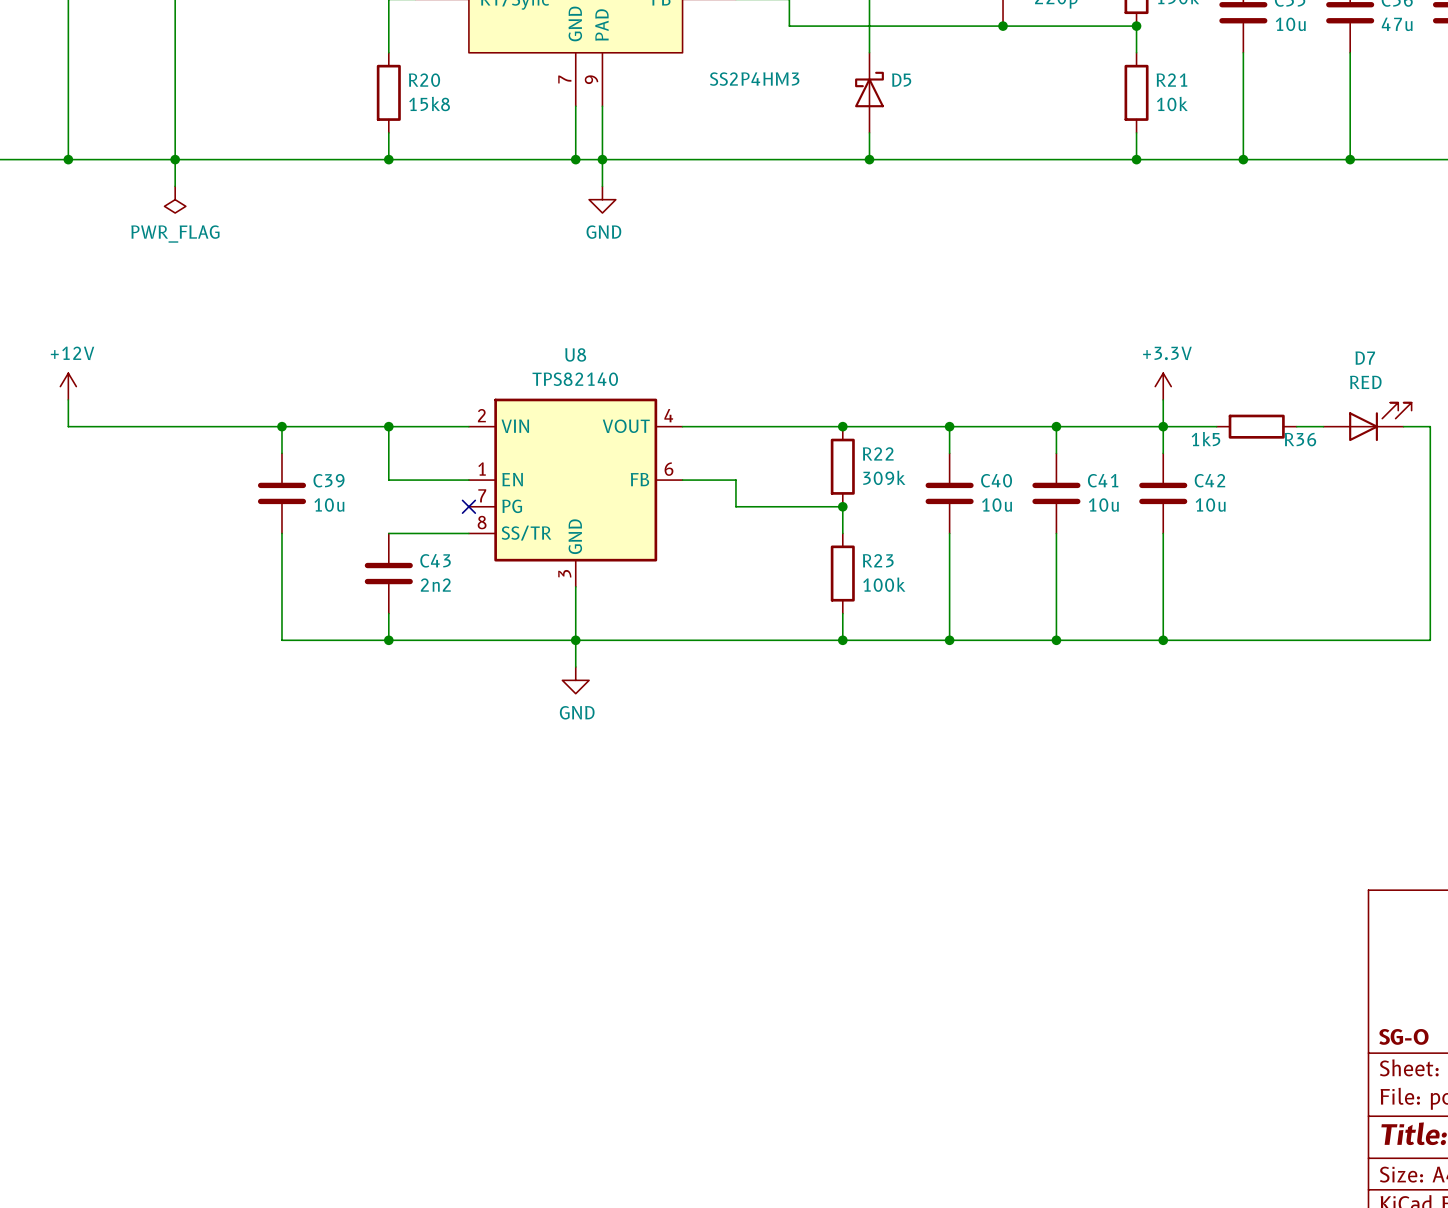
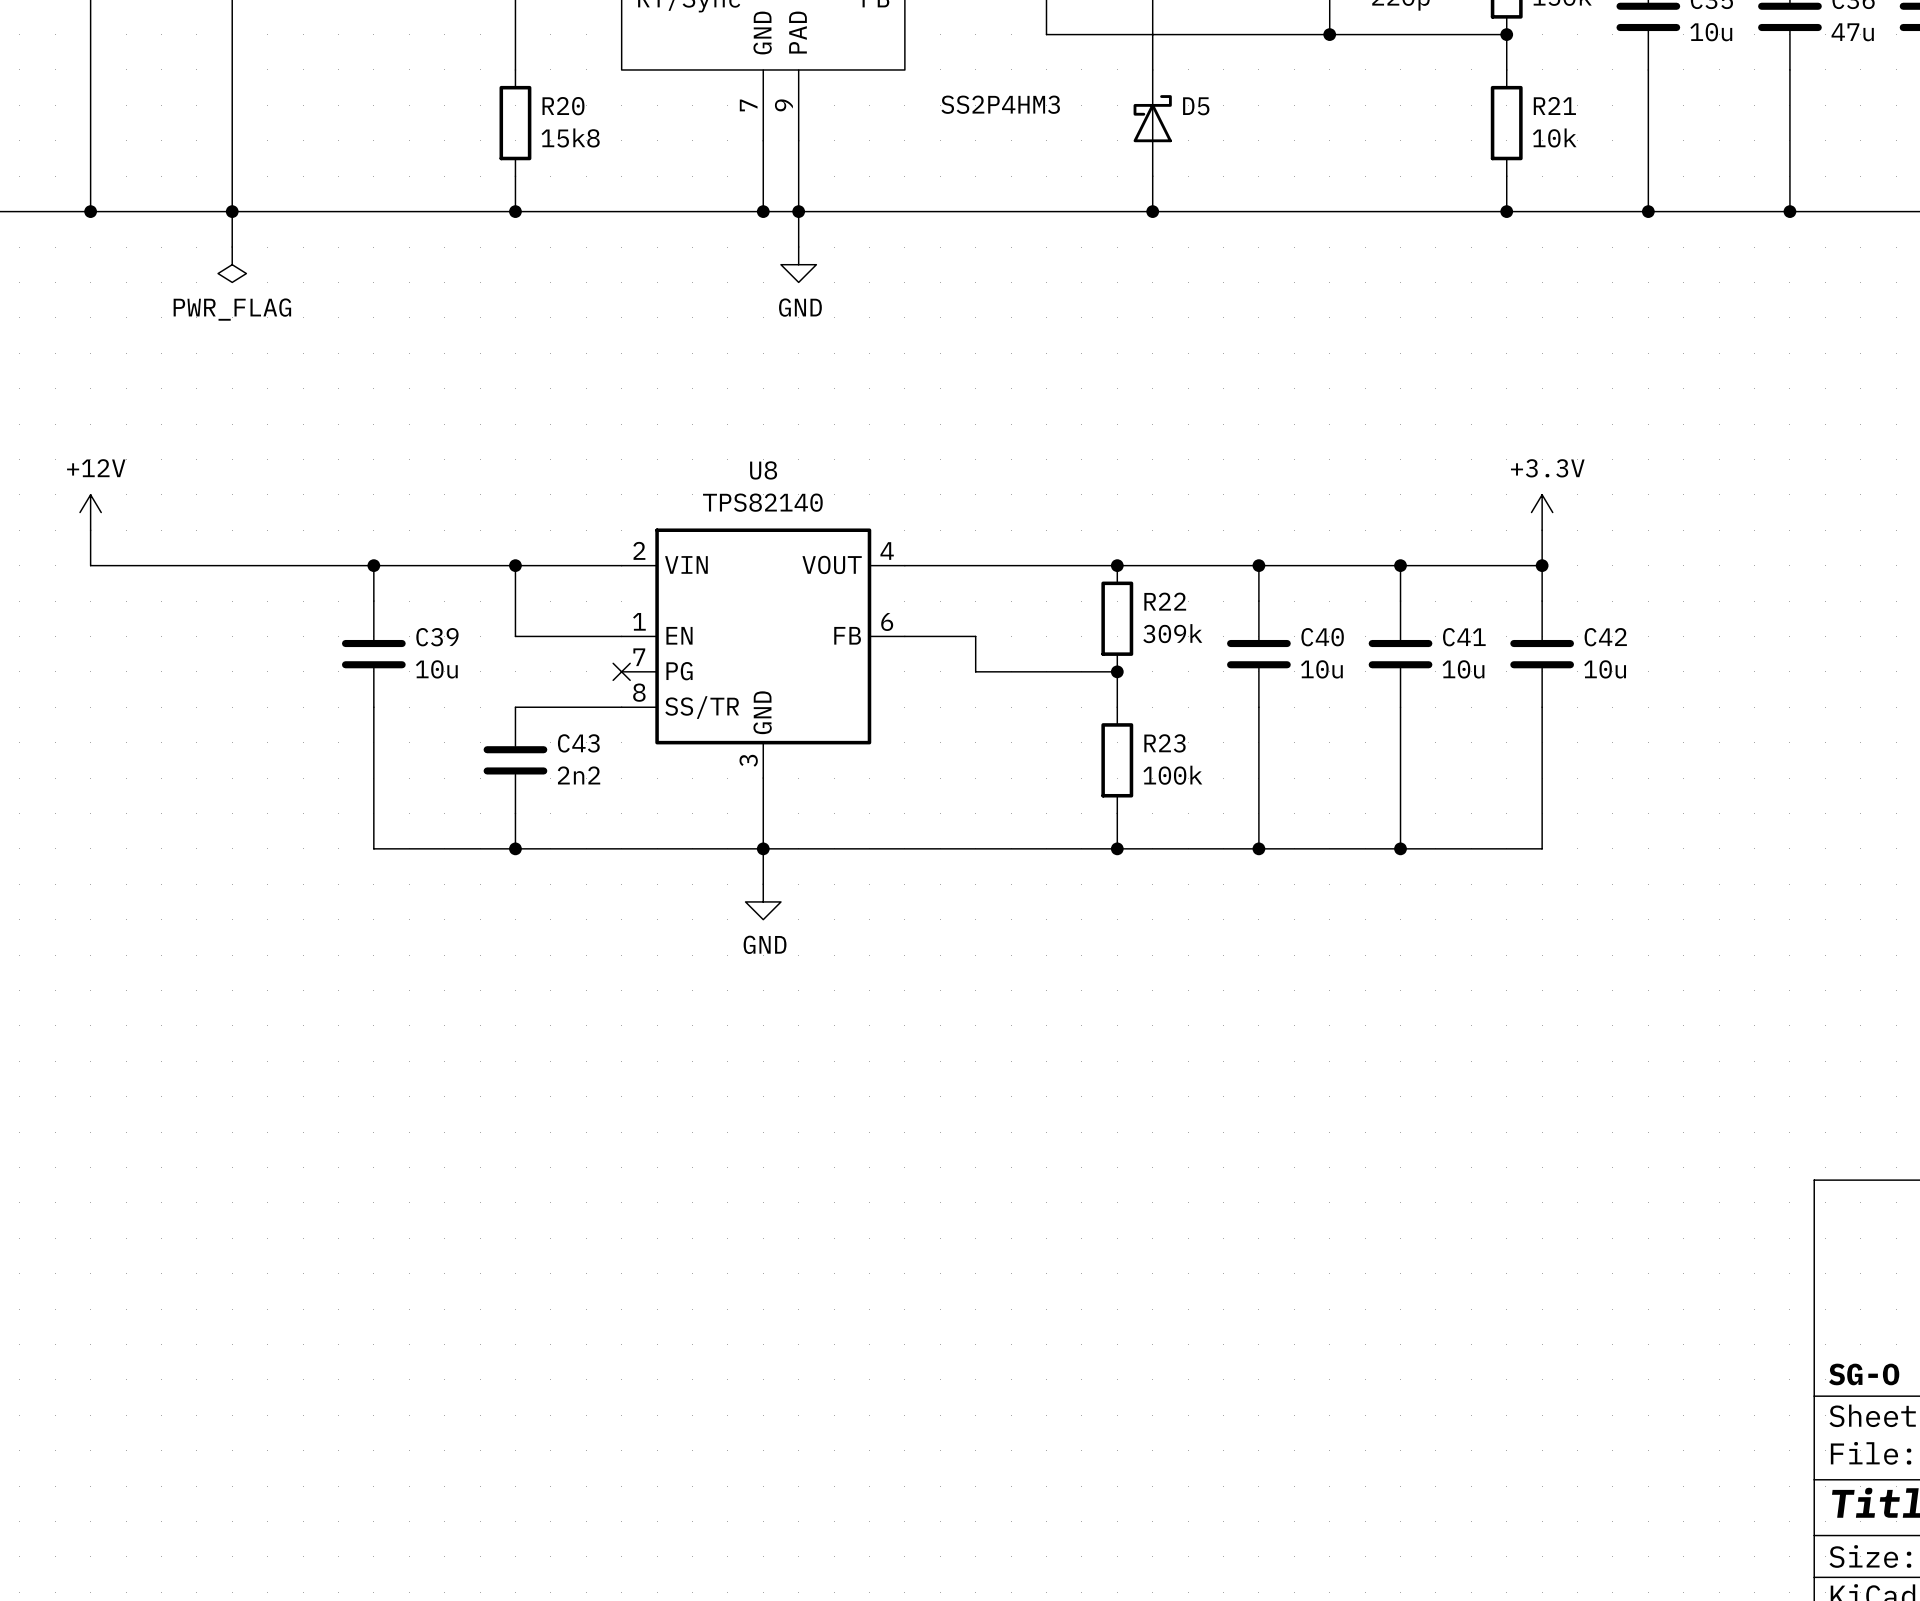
D7: RED (1367, 421) -> none
wire: (1163, 426) (1216, 426) -> none
R36: 1k5 (1256, 426) -> none
wire: (1296, 426) (1323, 426) -> none
wire: (1403, 426) (1430, 426) (1430, 640) (1163, 640) -> none
junction: (1163, 640) -> none

